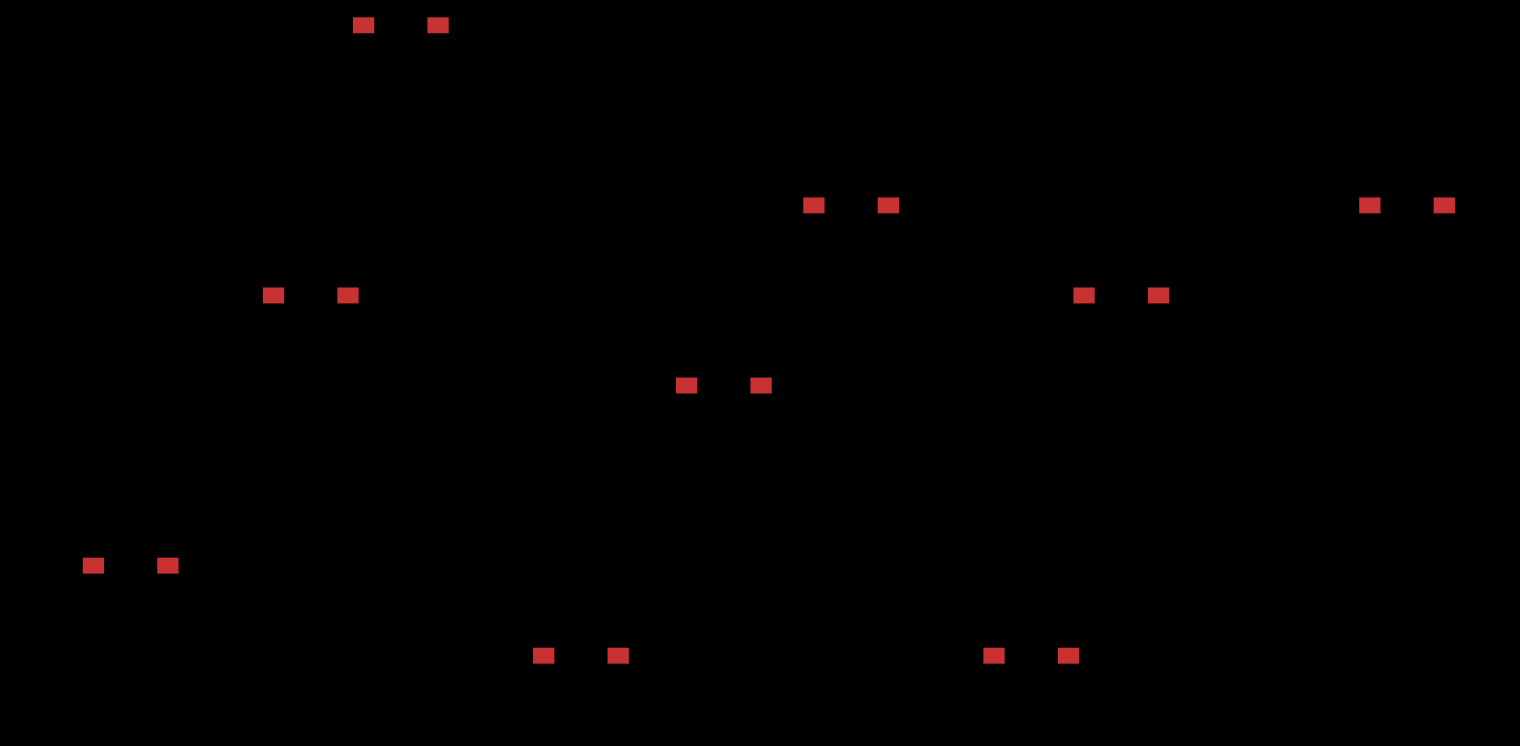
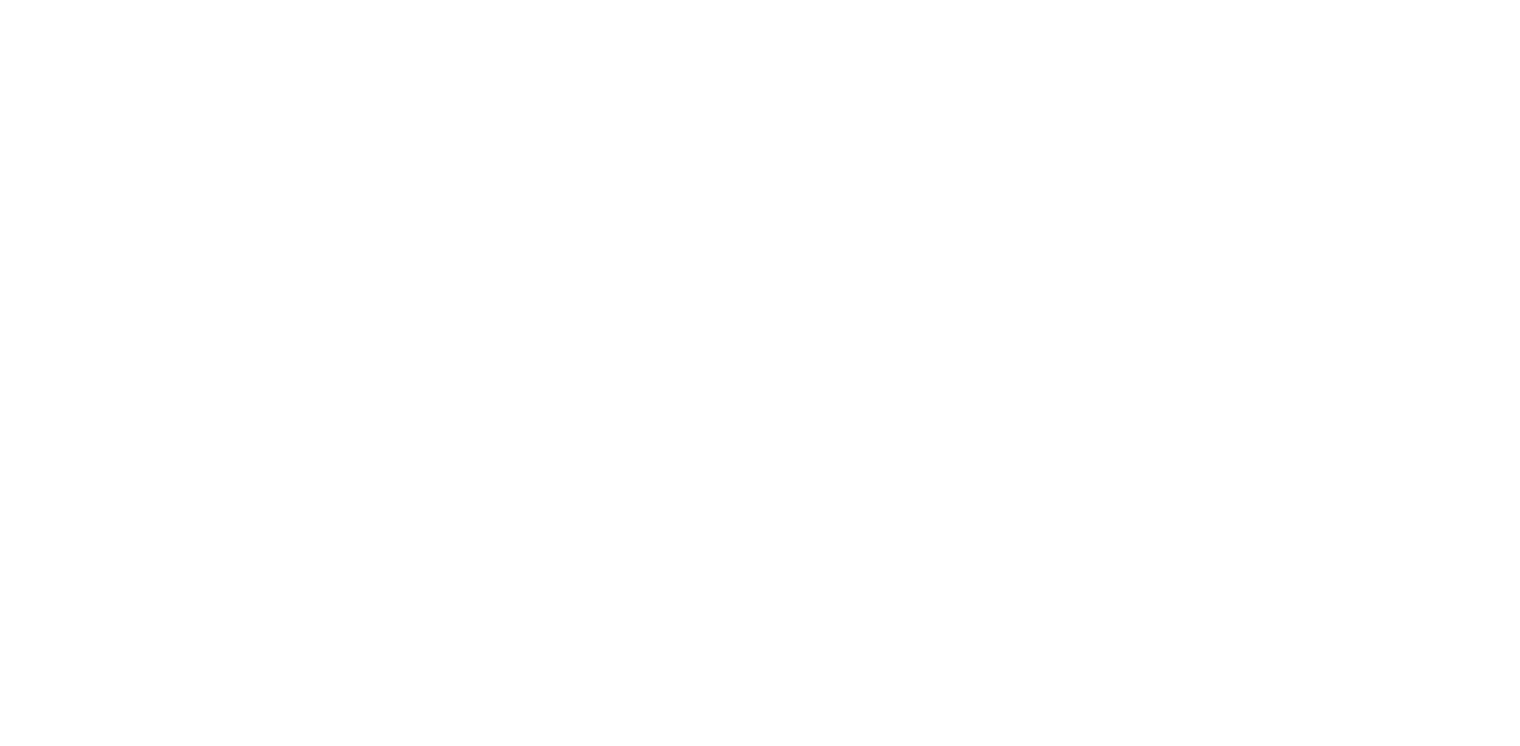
part: (400, 25) -> none
part: (851, 205) -> none
part: (1407, 205) -> none
part: (310, 295) -> none
part: (1121, 295) -> none
part: (723, 385) -> none
part: (130, 565) -> none
part: (580, 655) -> none
part: (1031, 655) -> none

